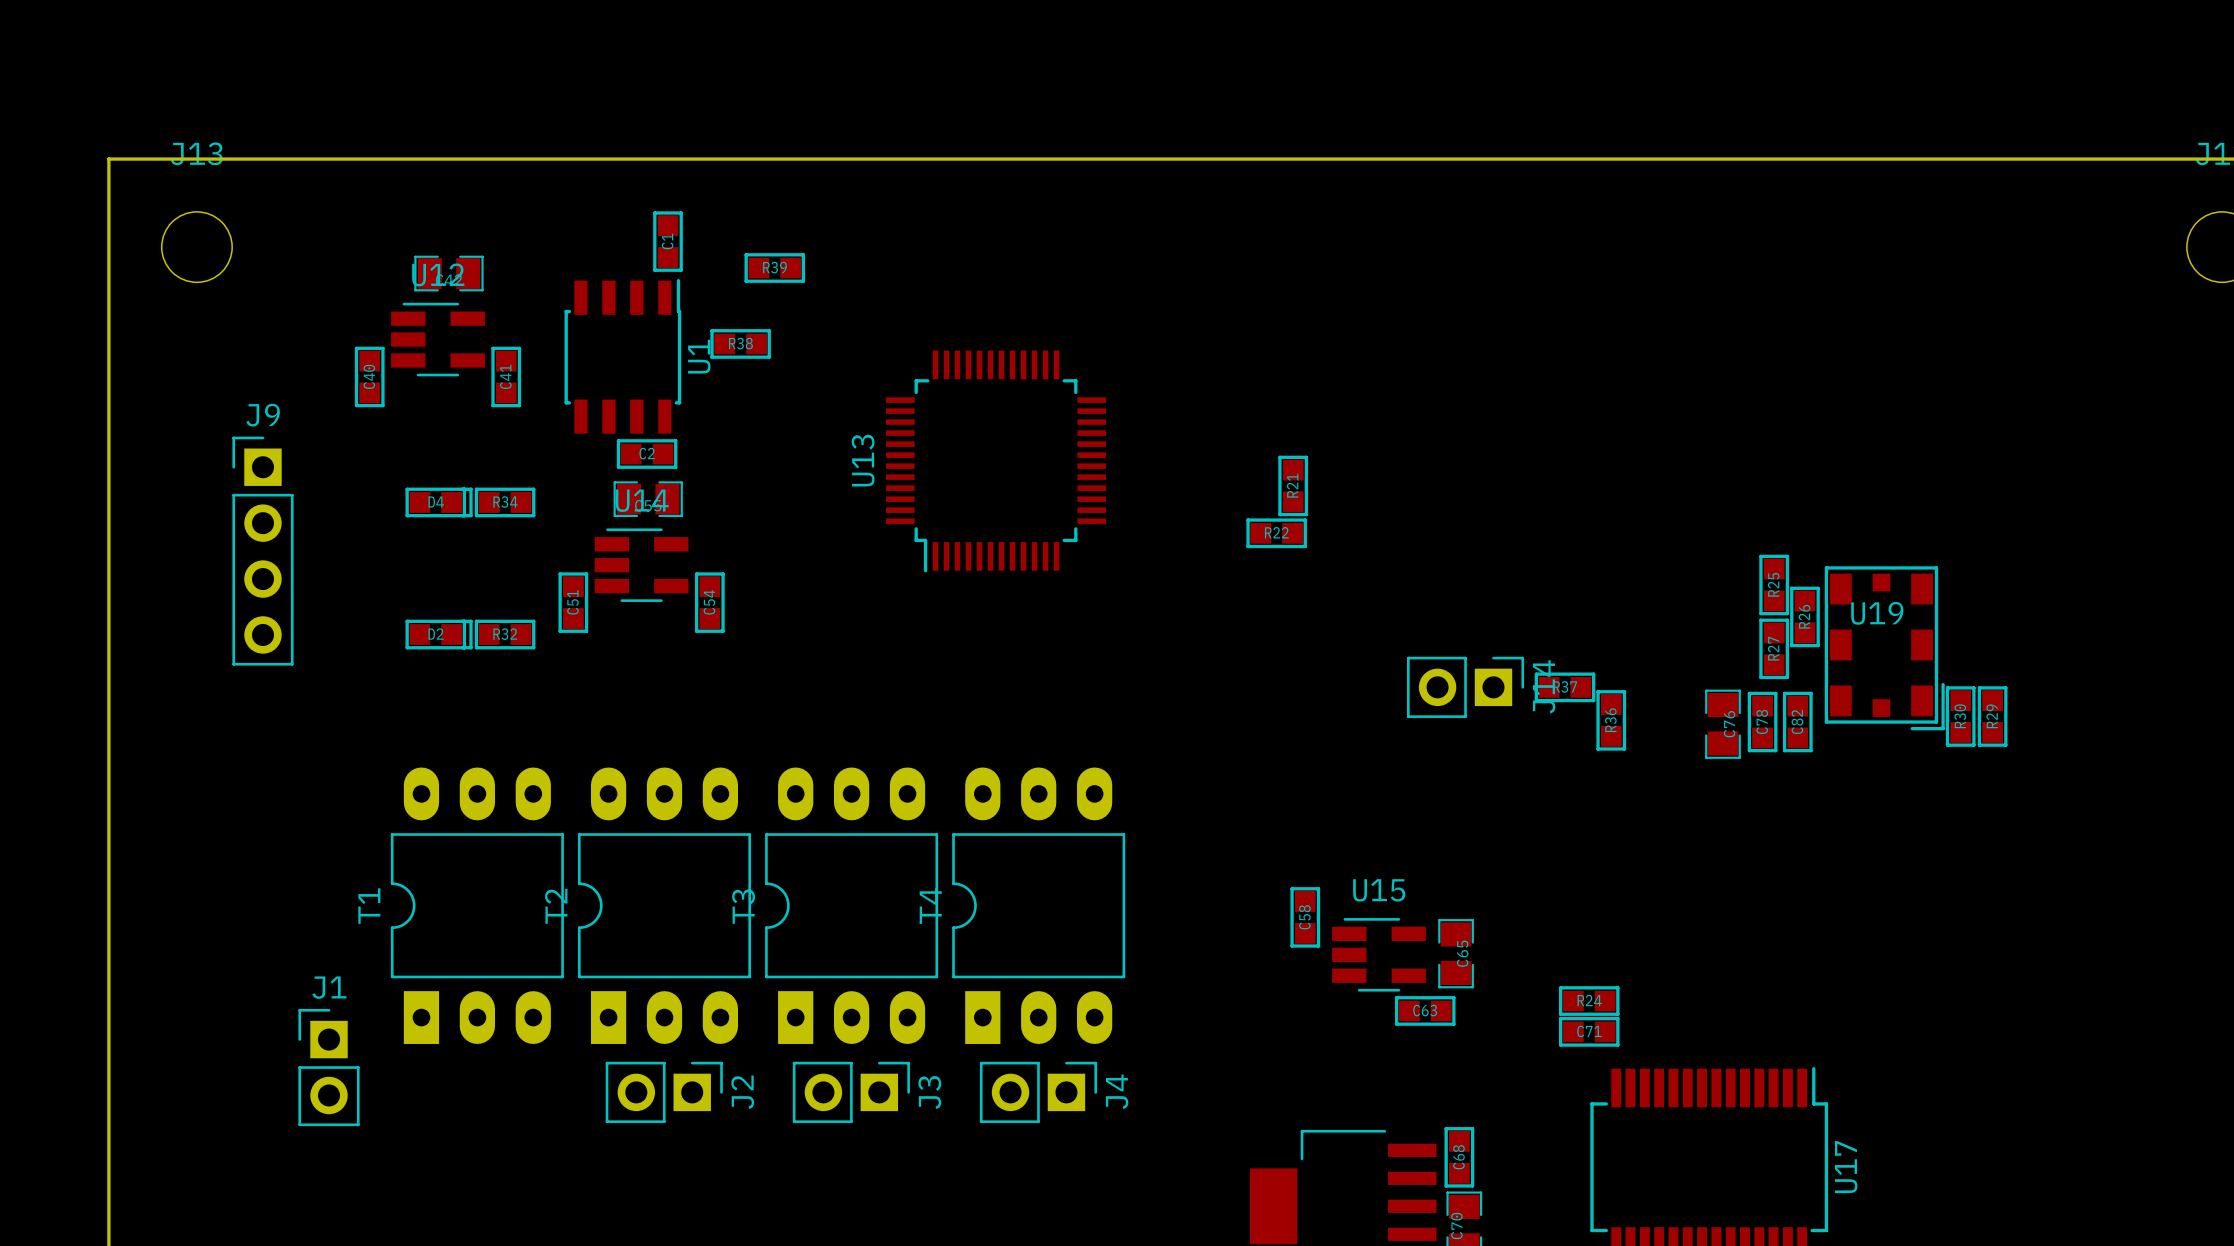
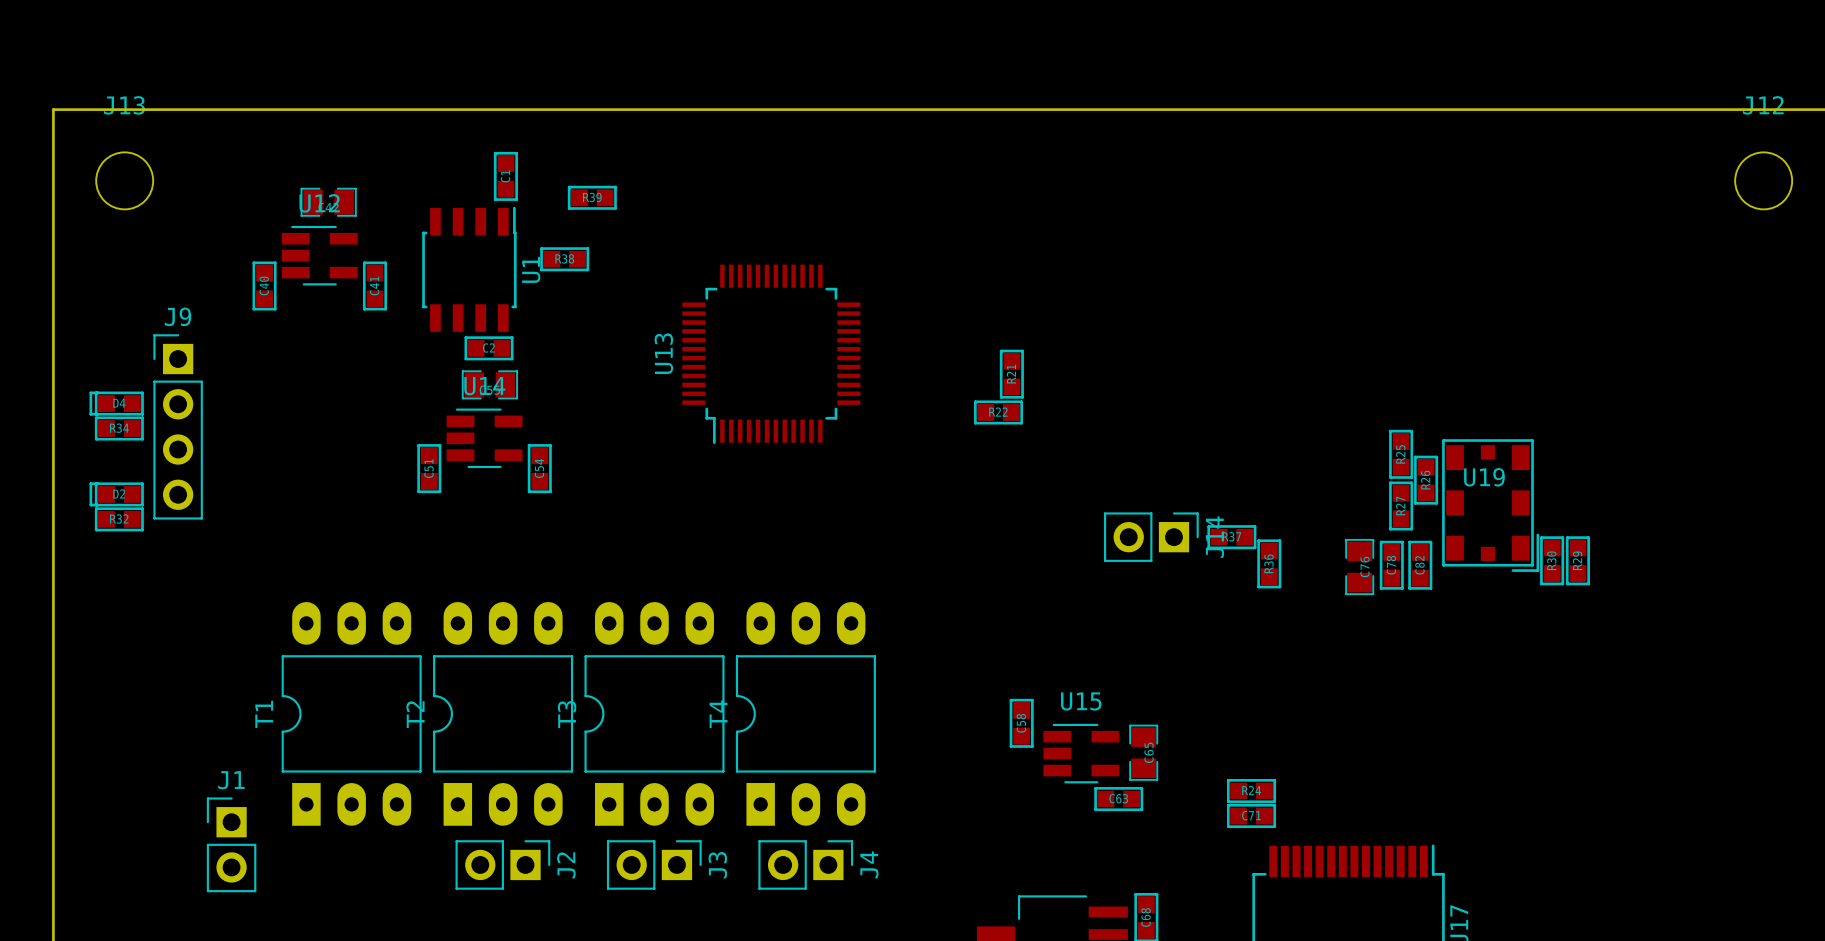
D4 rotation: 0° (439, 502) -> 180° (116, 403)
D4 position: (439, 502) -> (116, 403)
R34 position: (505, 502) -> (119, 428)
D2 rotation: 0° (439, 634) -> 180° (116, 494)
D2 position: (439, 634) -> (116, 494)
R32 position: (505, 634) -> (119, 519)

